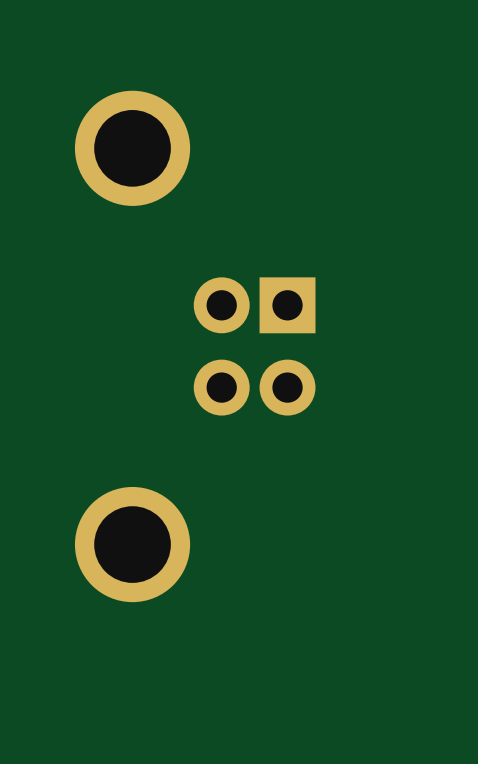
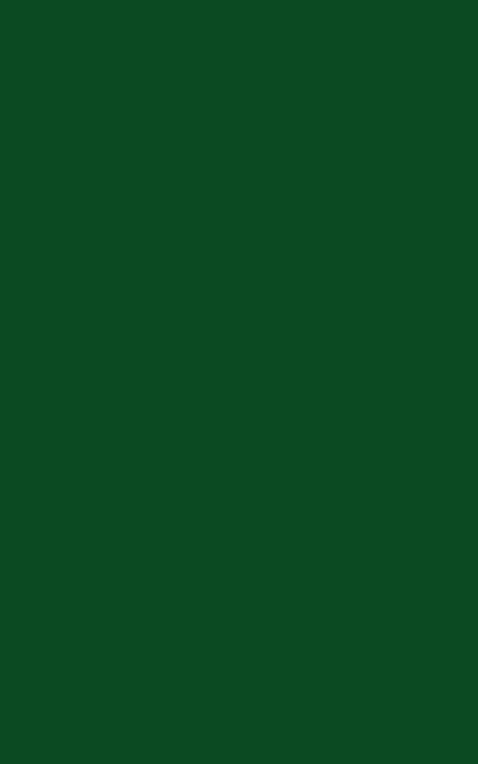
part: (195, 346) -> none

